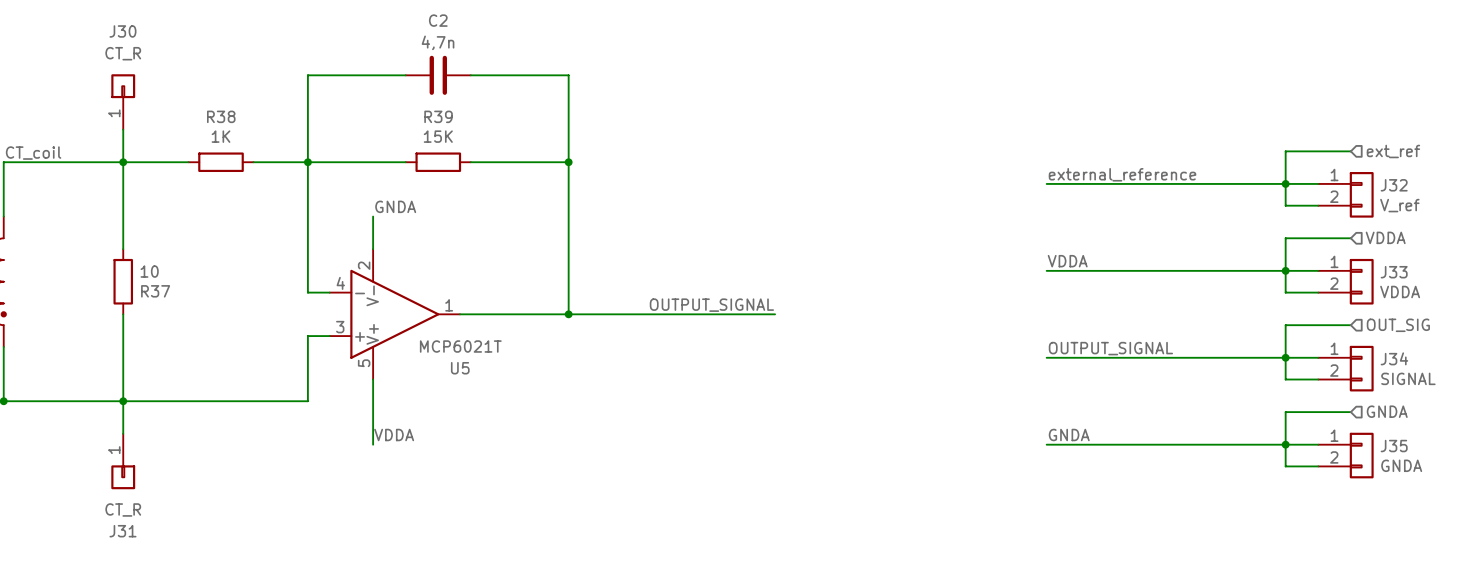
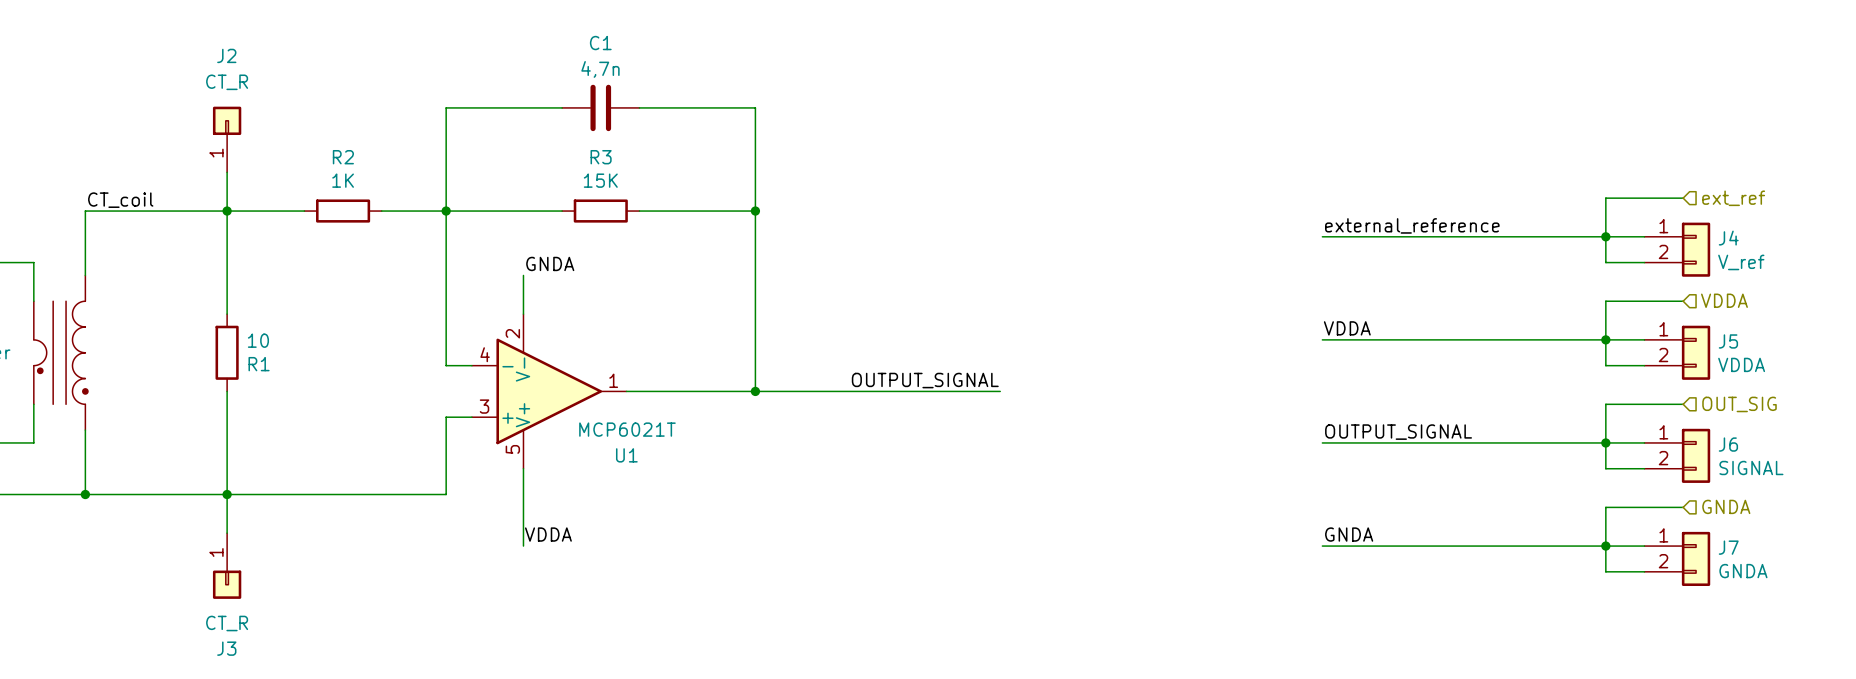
C2 name: C2 (438, 20) -> C1 (600, 43)
J30 name: J30 (122, 31) -> J2 (226, 55)
R38 name: R38 (221, 116) -> R2 (343, 157)
R39 name: R39 (438, 116) -> R3 (601, 157)
J32 name: J32 (1394, 185) -> J4 (1728, 238)
J33 name: J33 (1394, 272) -> J5 (1728, 341)
R37 name: R37 (155, 291) -> R1 (259, 364)
J34 name: J34 (1394, 358) -> J6 (1728, 444)
U5 name: U5 (460, 368) -> U1 (626, 455)
J35 name: J35 (1394, 446) -> J7 (1728, 547)
J31 name: J31 (122, 531) -> J3 (226, 648)

